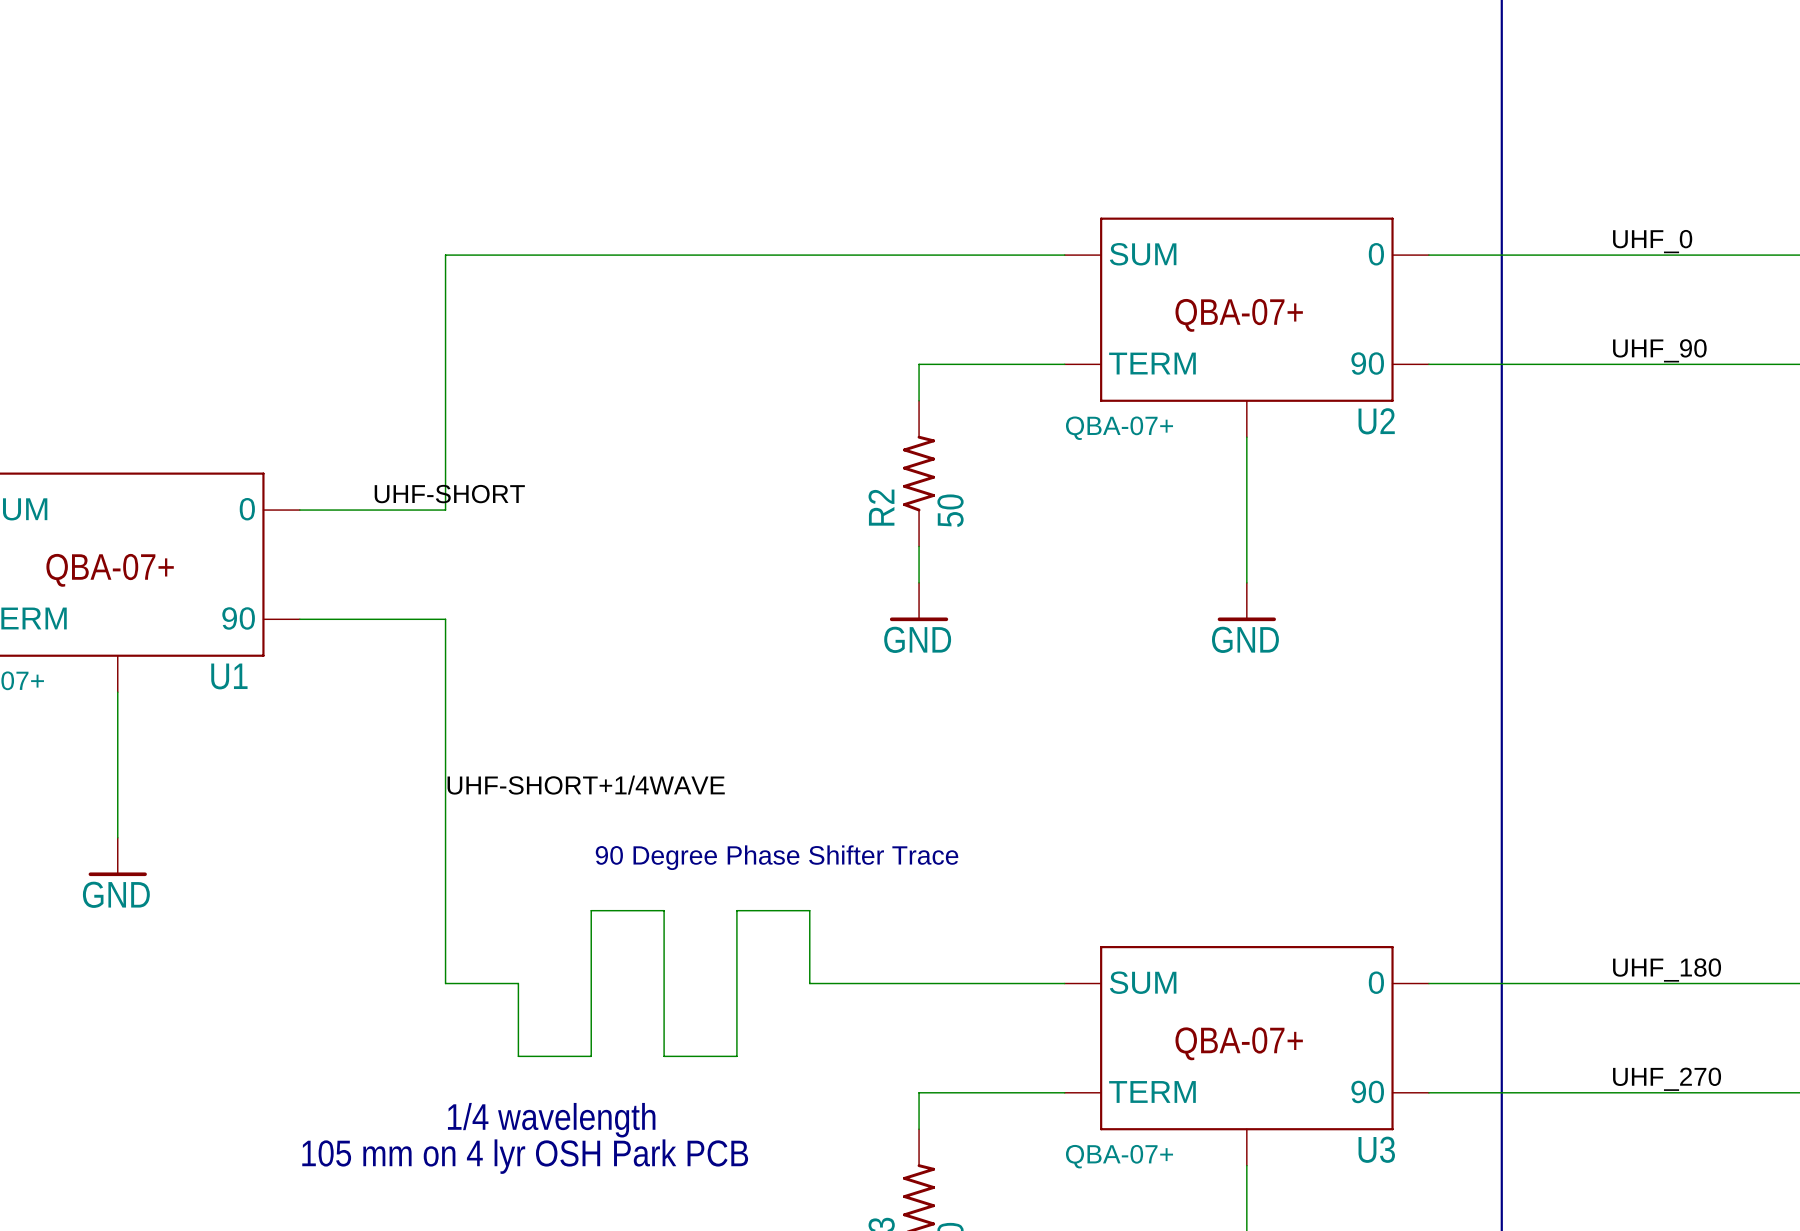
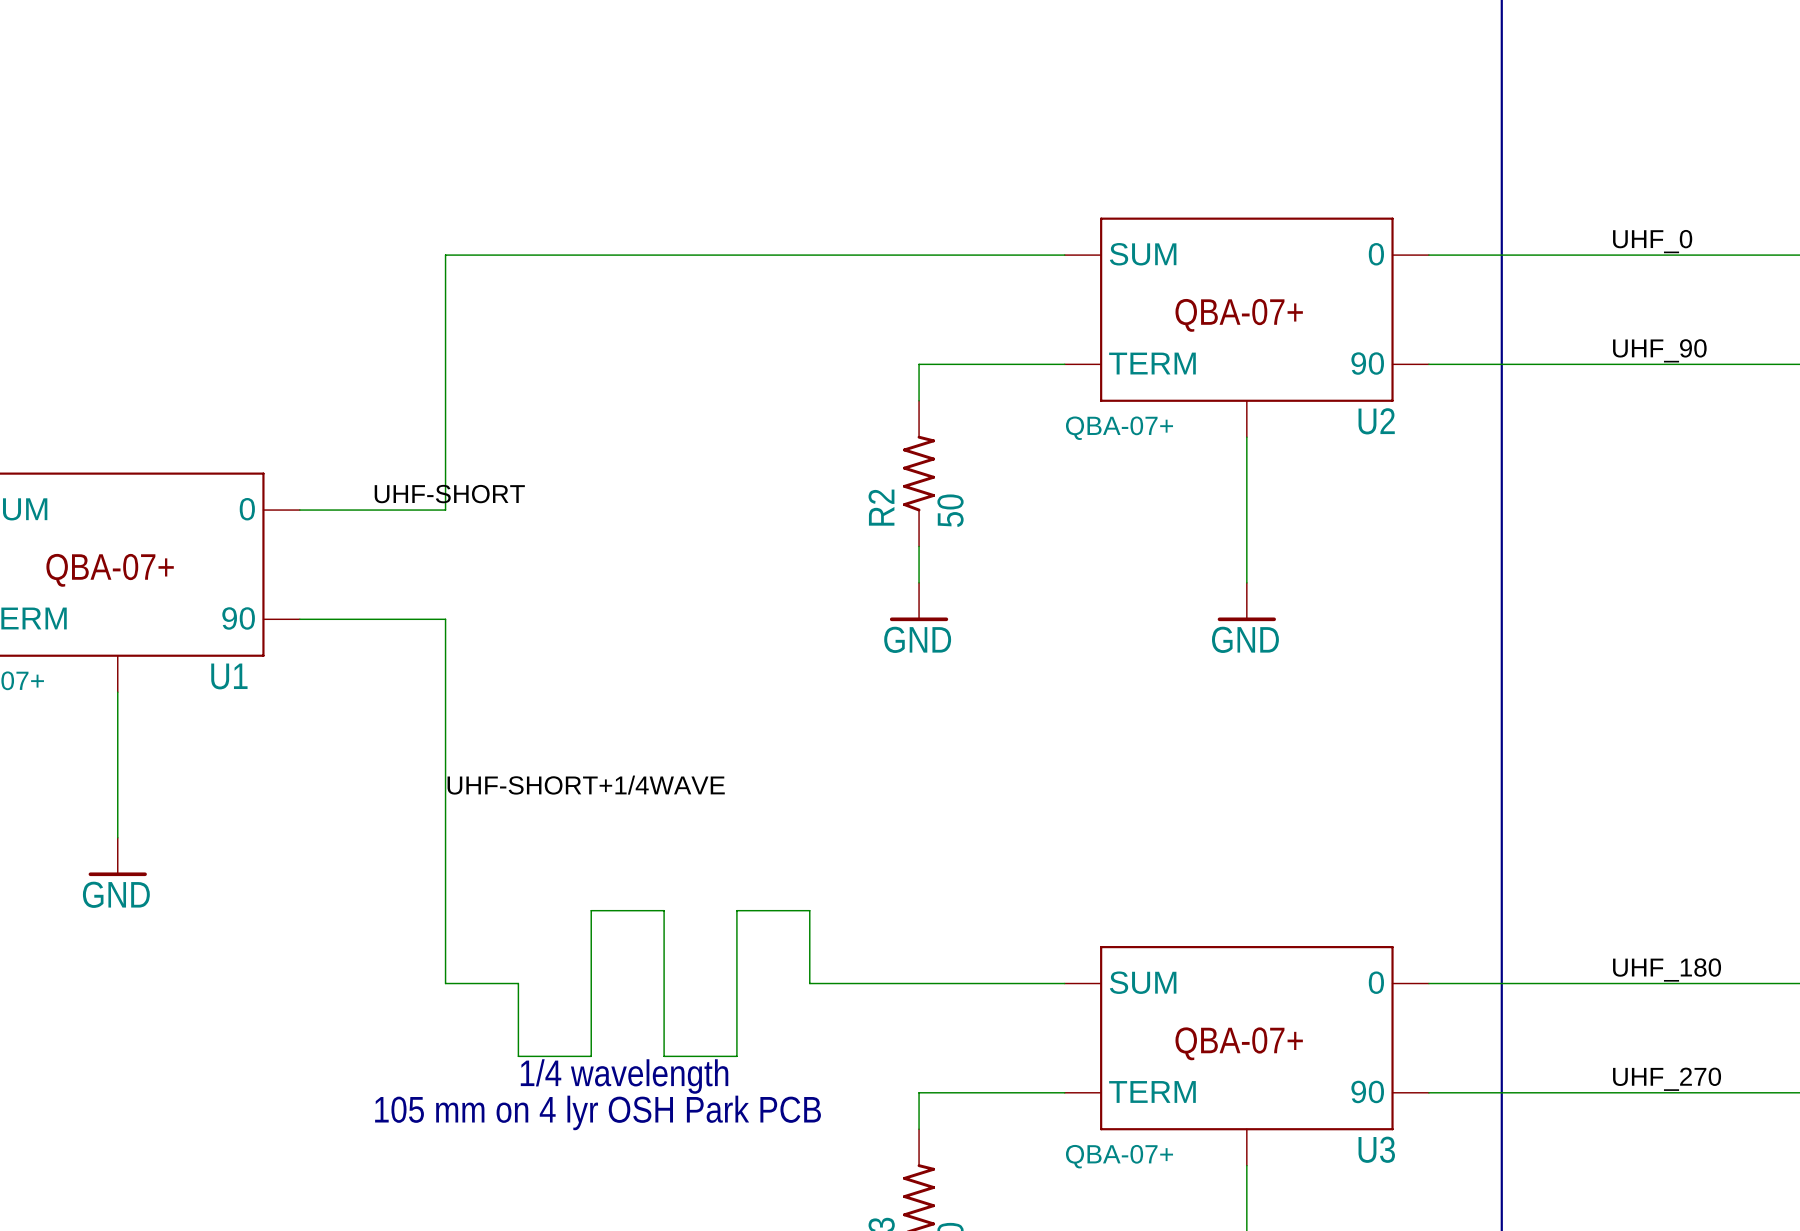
text: 90 Degree Phase Shifter Trace (777, 857) -> none
text position: 1/4 wavelength (551, 1120) -> 1/4 wavelength (624, 1076)
text position: 105 mm on 4 lyr OSH Park PCB (525, 1156) -> 105 mm on 4 lyr OSH Park PCB (598, 1112)

